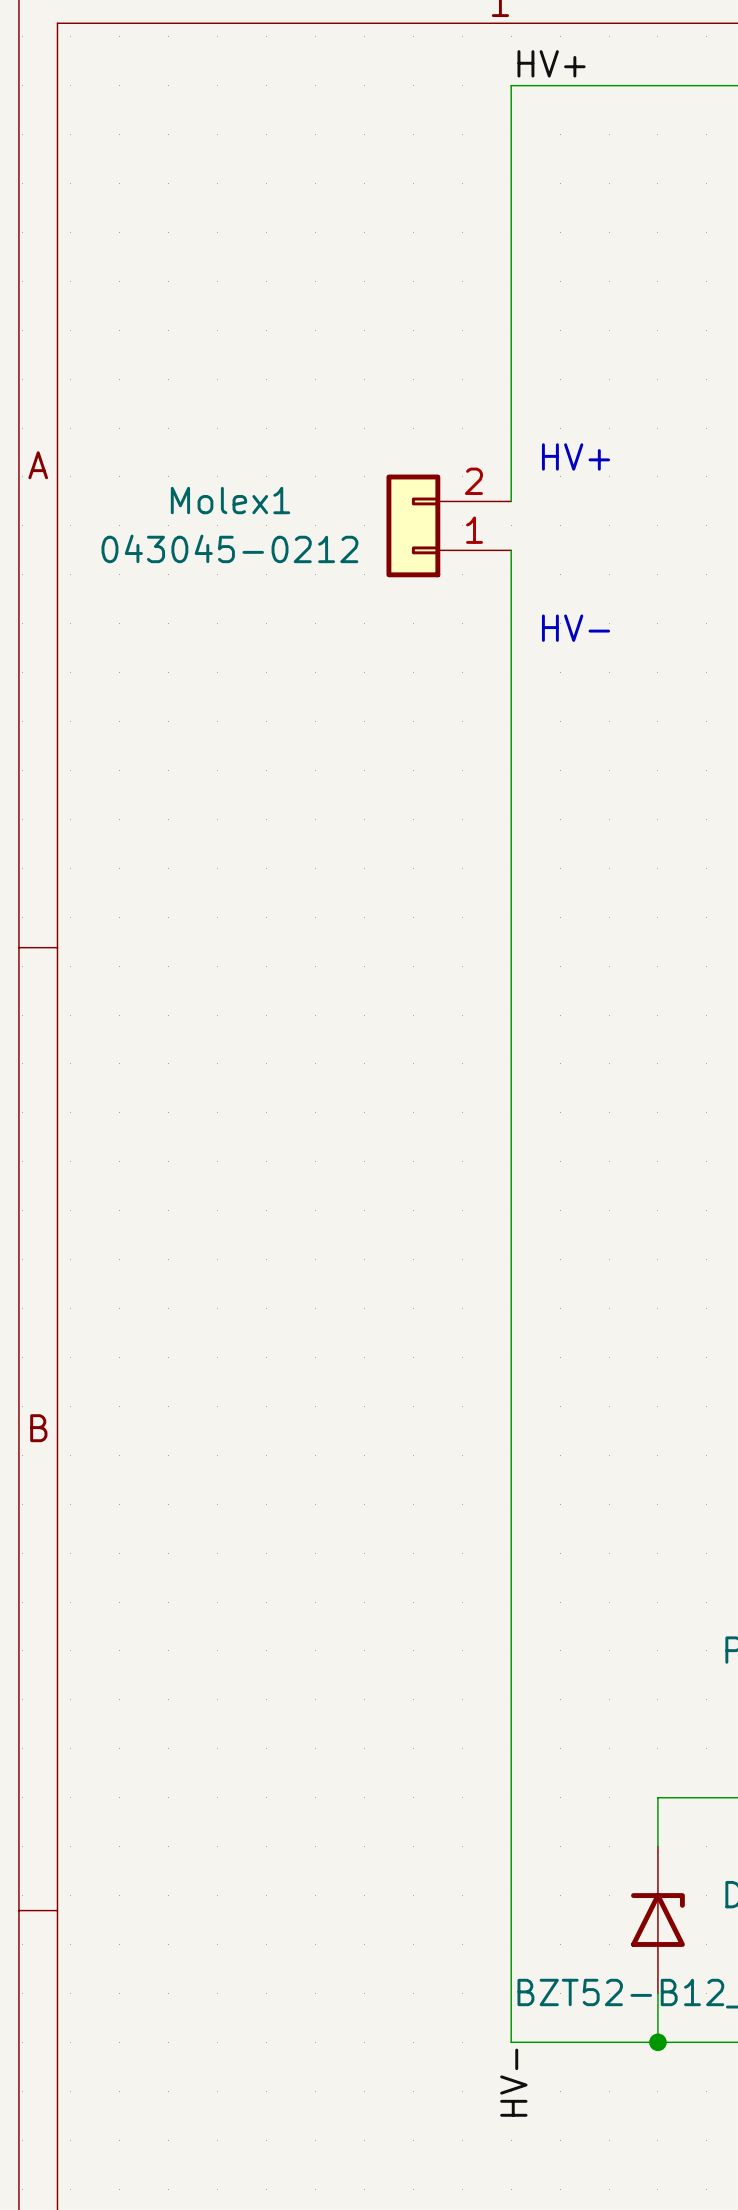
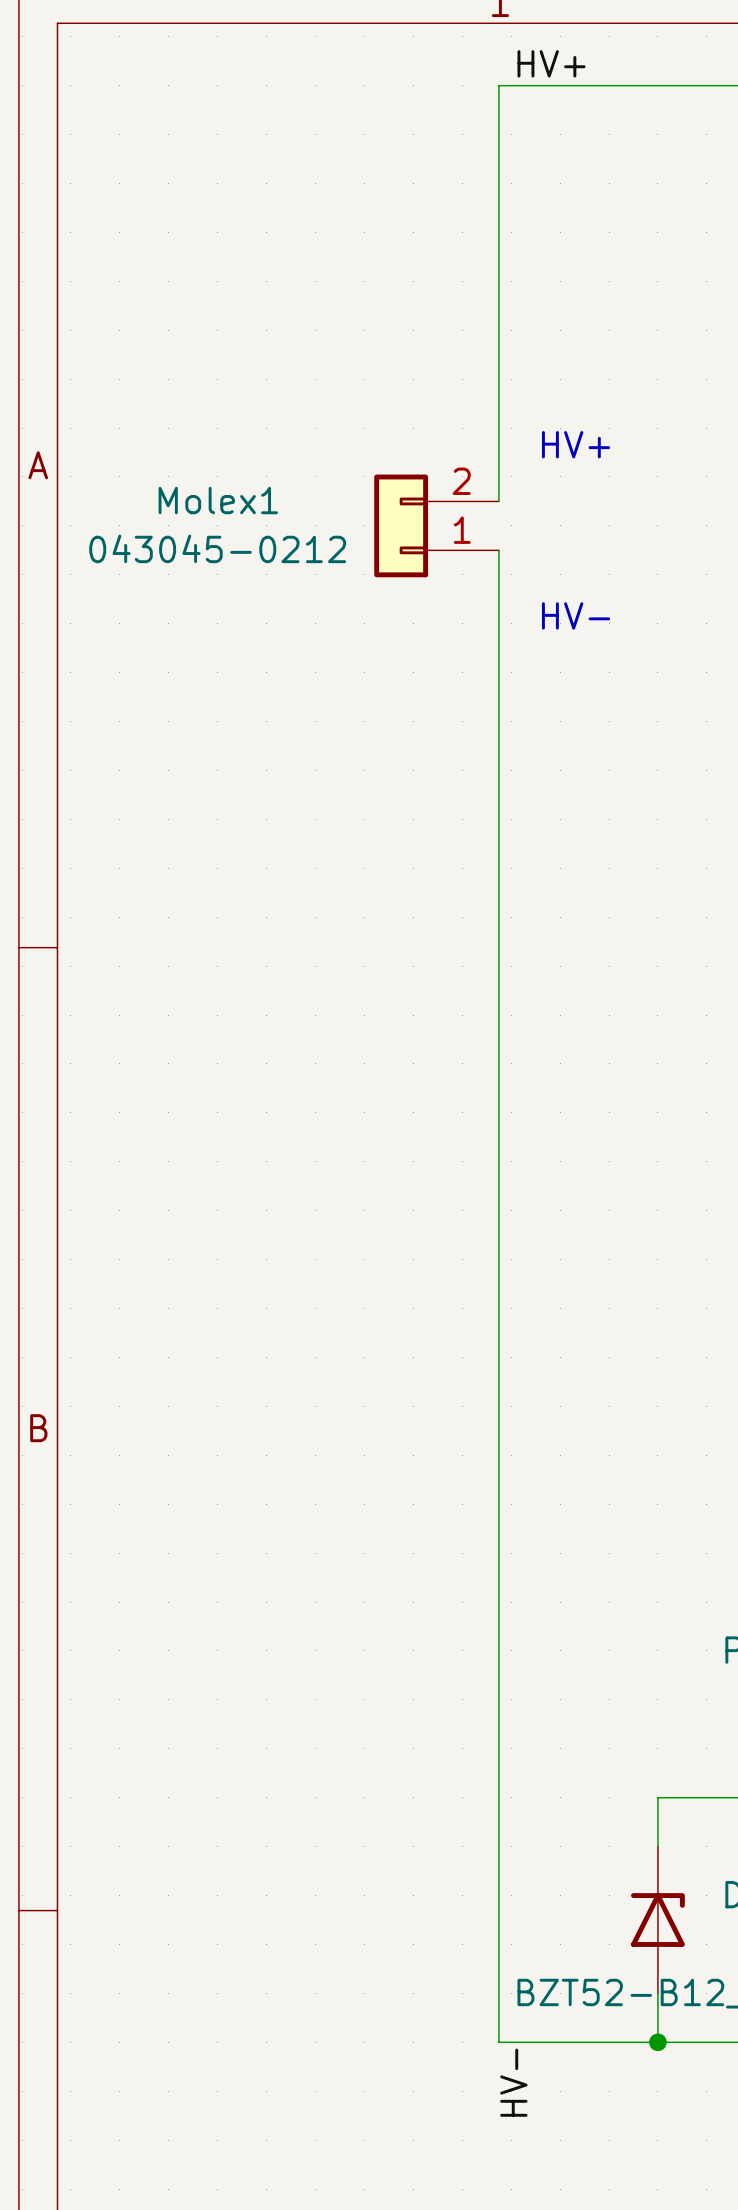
wire: (511, 85) (511, 501) -> (511, 85) (498, 85) (498, 501)
text position: HV+ (576, 456) -> HV+ (576, 444)
Molex1 position: (448, 525) -> (436, 525)
wire: (511, 550) (511, 2042) -> (498, 550) (498, 2042) (511, 2042)
text position: HV- (576, 628) -> HV- (576, 615)

